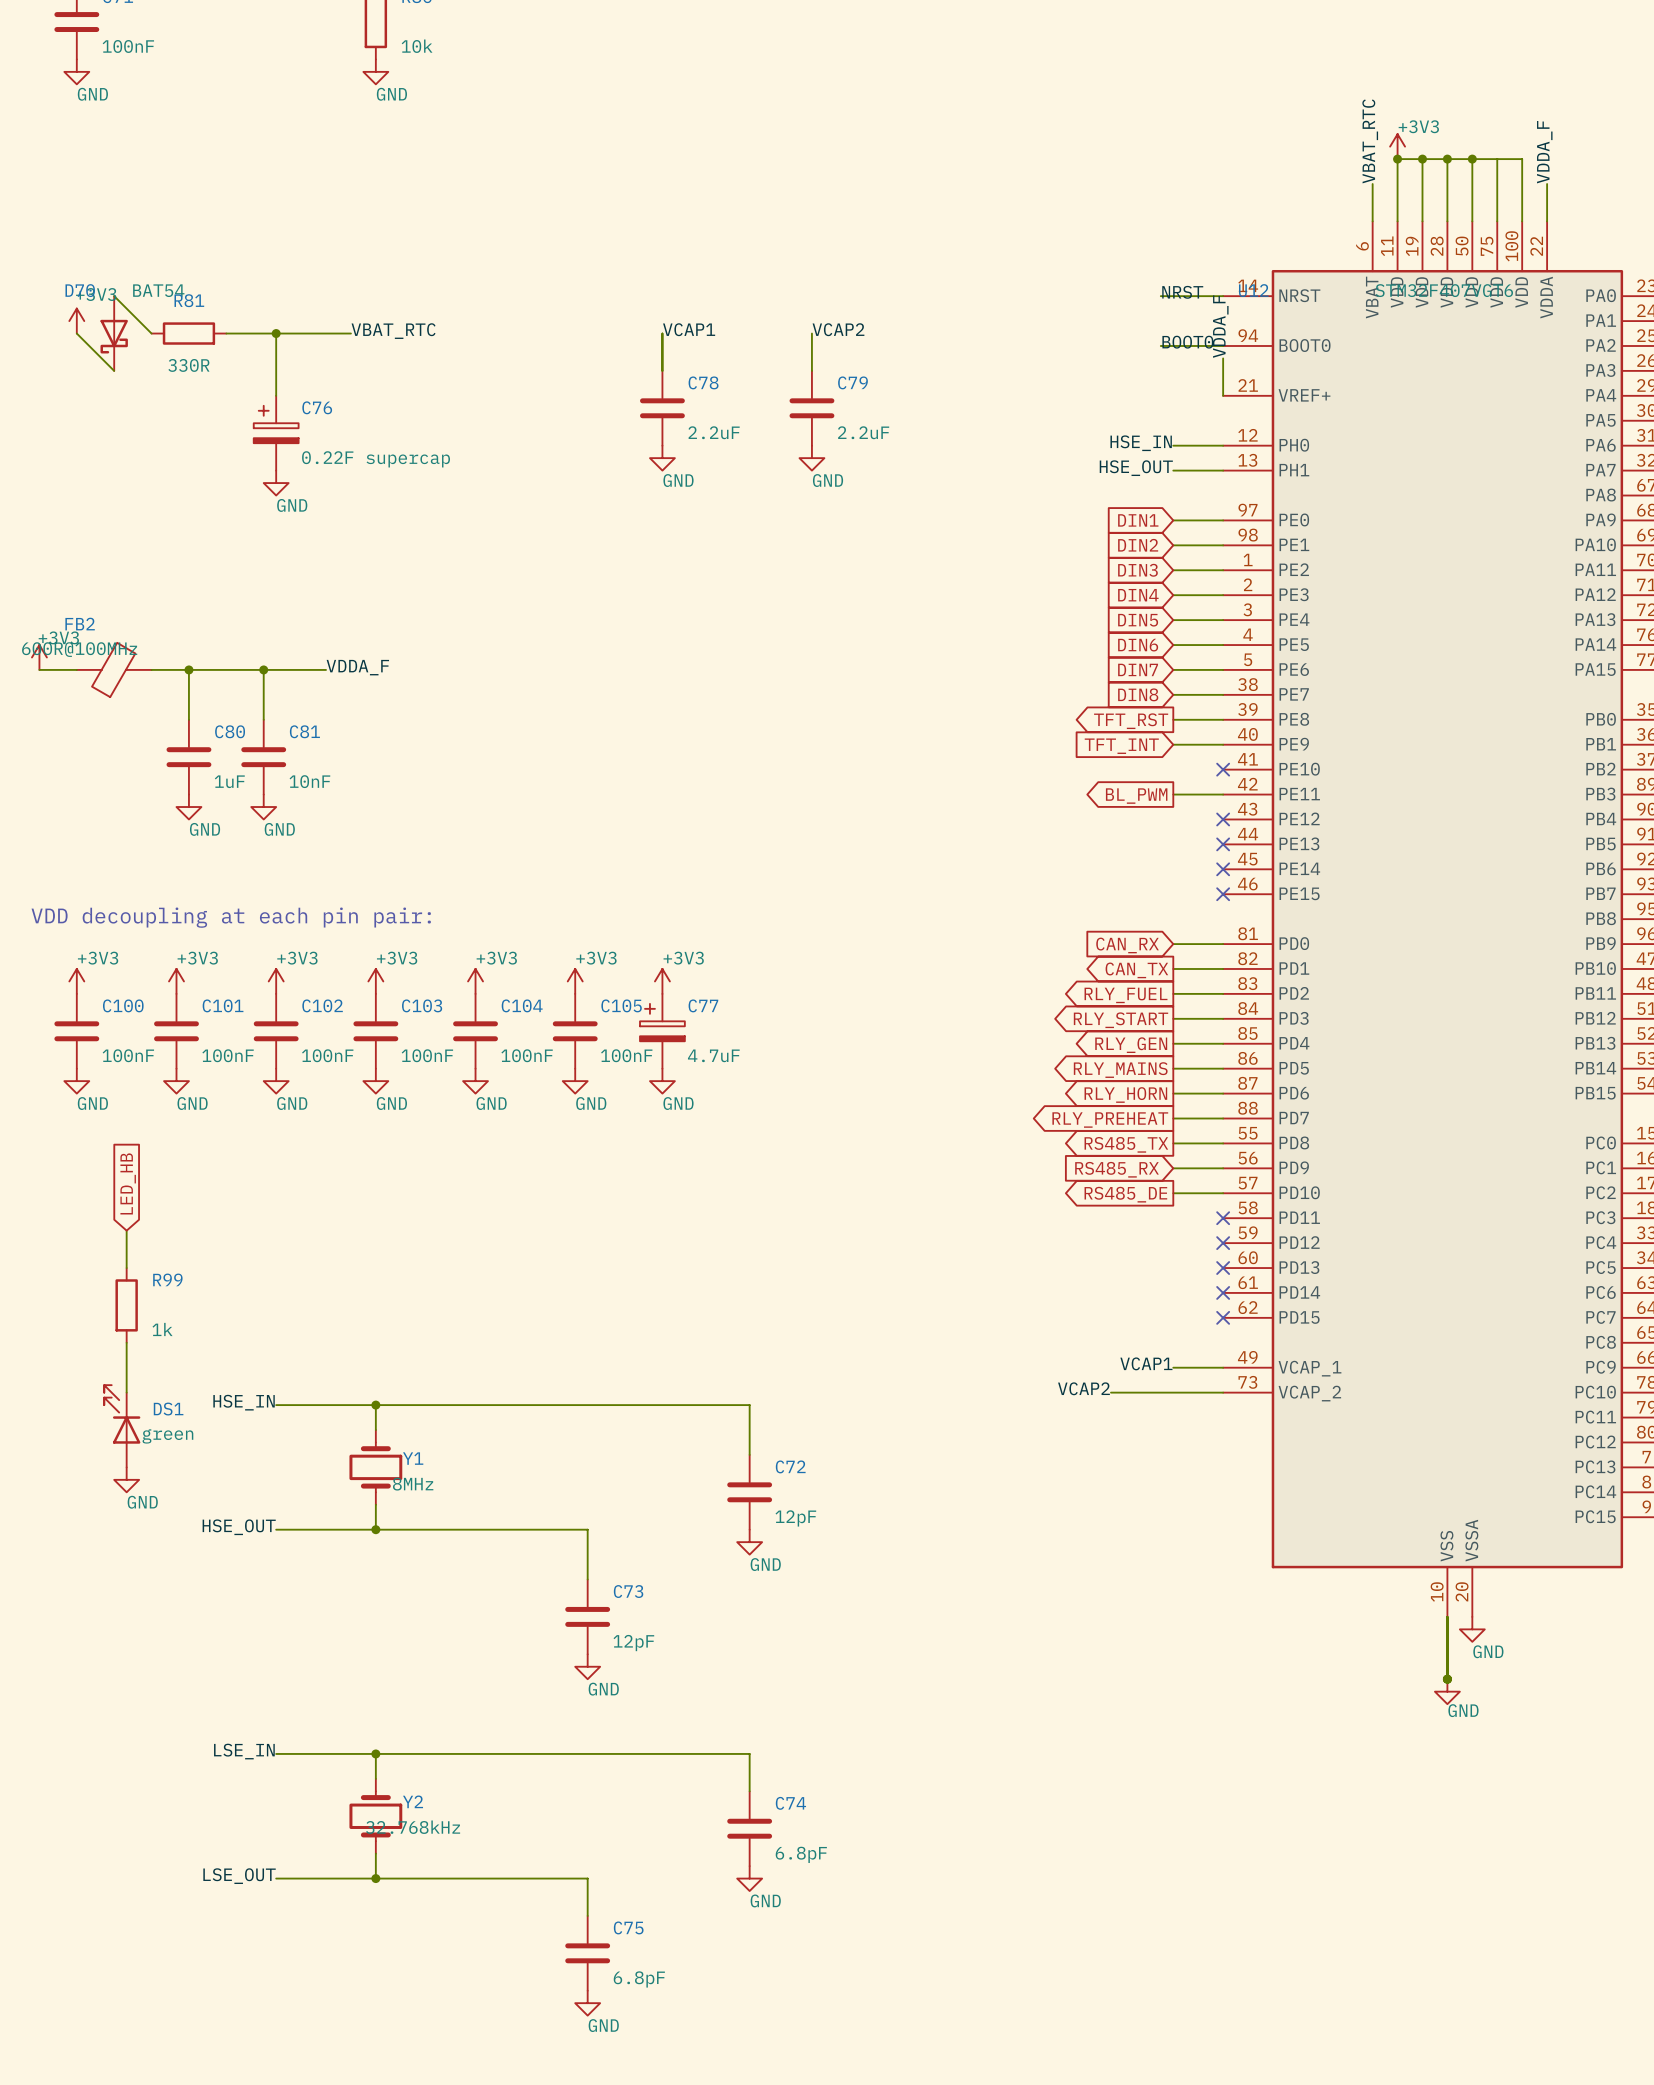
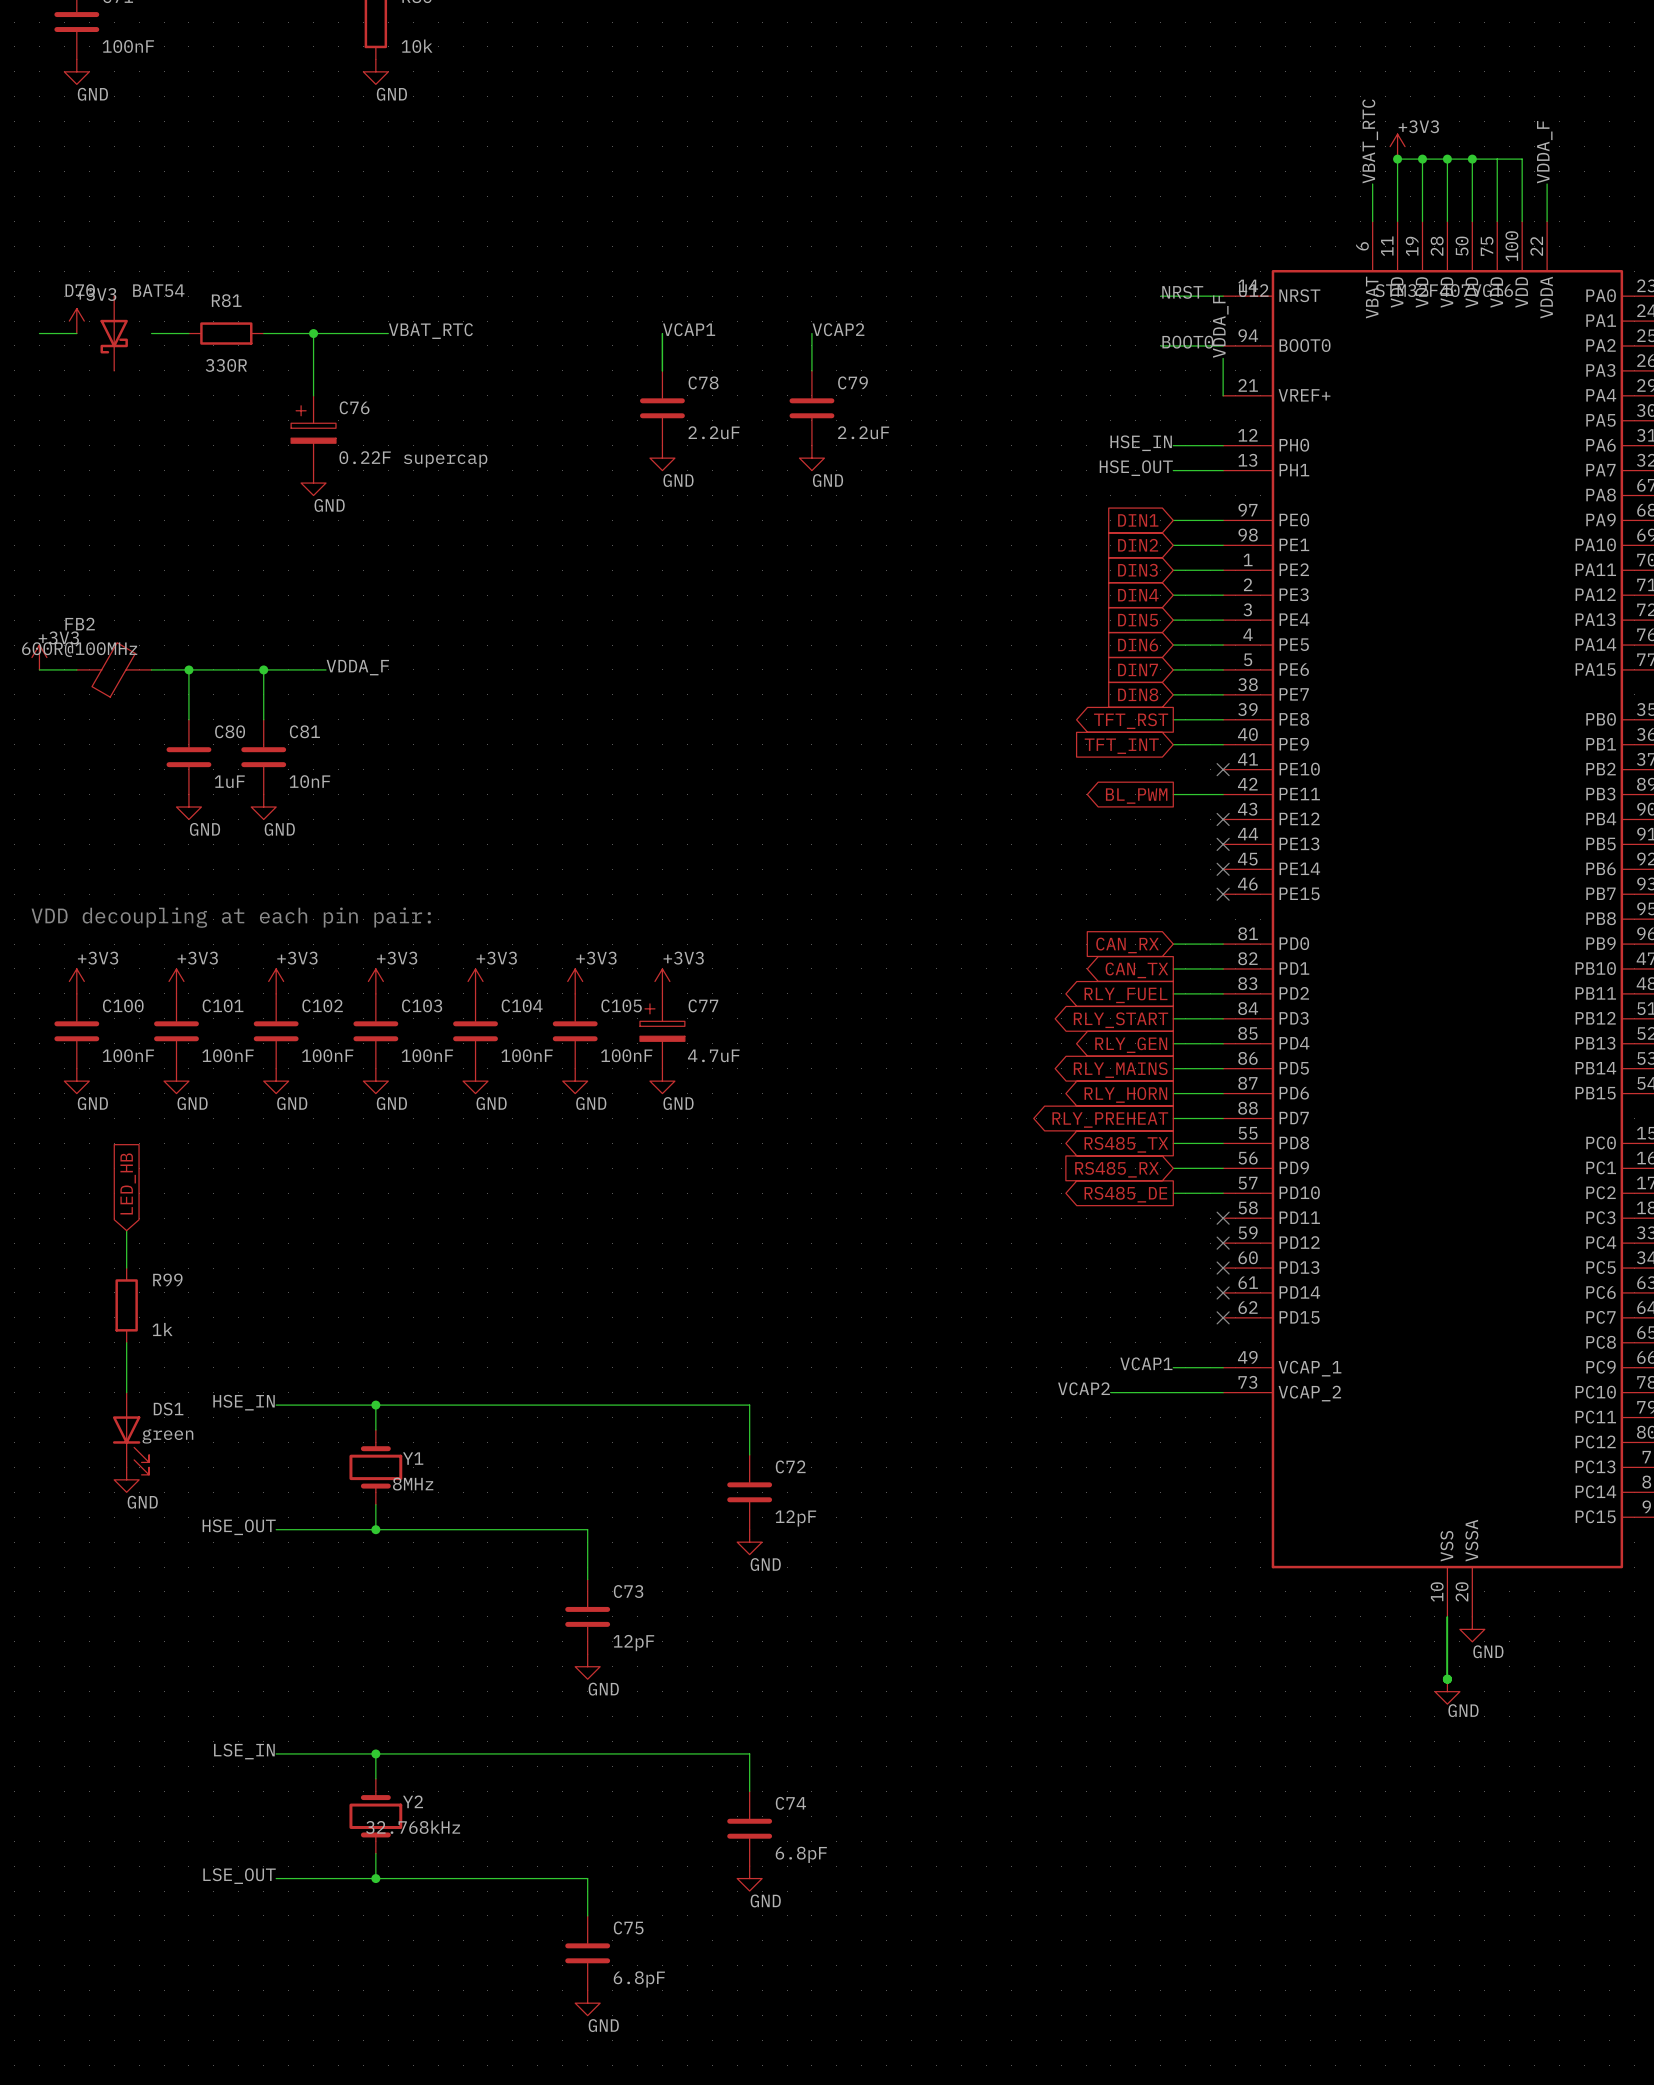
wire: (114, 296) (151, 333) -> (188, 333) (151, 333)
label position: VBAT_RTC (393, 331) -> VBAT_RTC (430, 331)
wire: (76, 333) (114, 370) -> (76, 333) (39, 333)
R81 position: (188, 333) -> (226, 333)
wire: (226, 333) (263, 333) -> (350, 333) (388, 333)
wire: (276, 333) (276, 395) -> (313, 333) (313, 395)
junction position: (276, 333) -> (313, 333)
C76 position: (276, 433) -> (313, 433)
power symbol position: GND (276, 483) -> GND (313, 483)
DS1 rotation: 0° (122, 1414) -> 180° (131, 1445)

